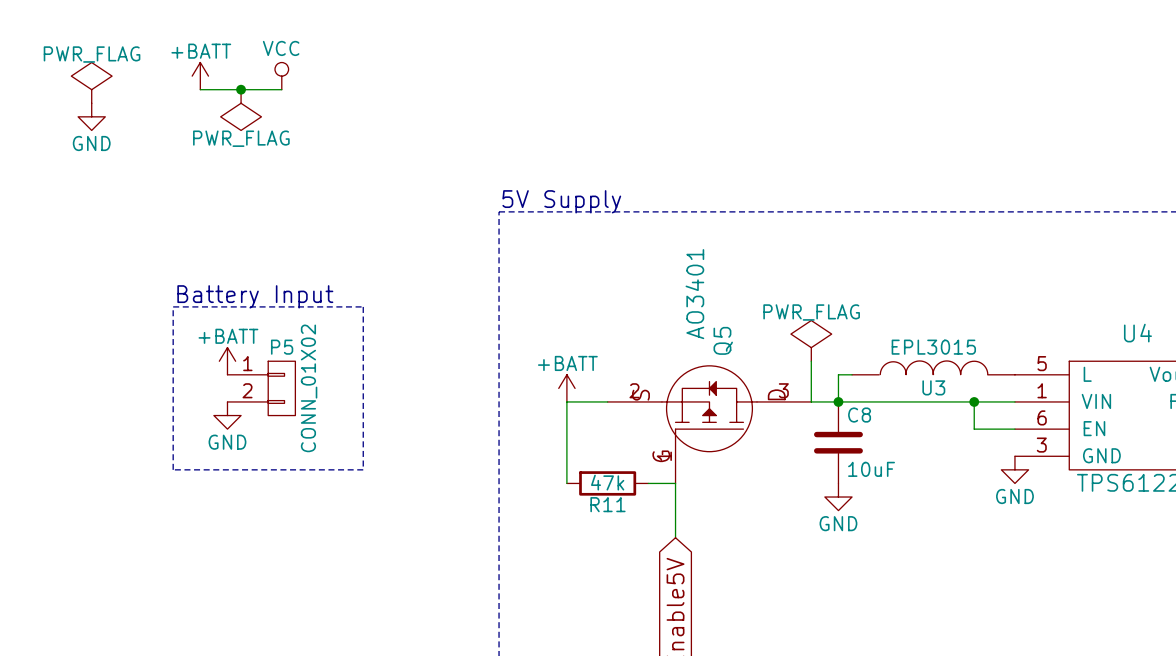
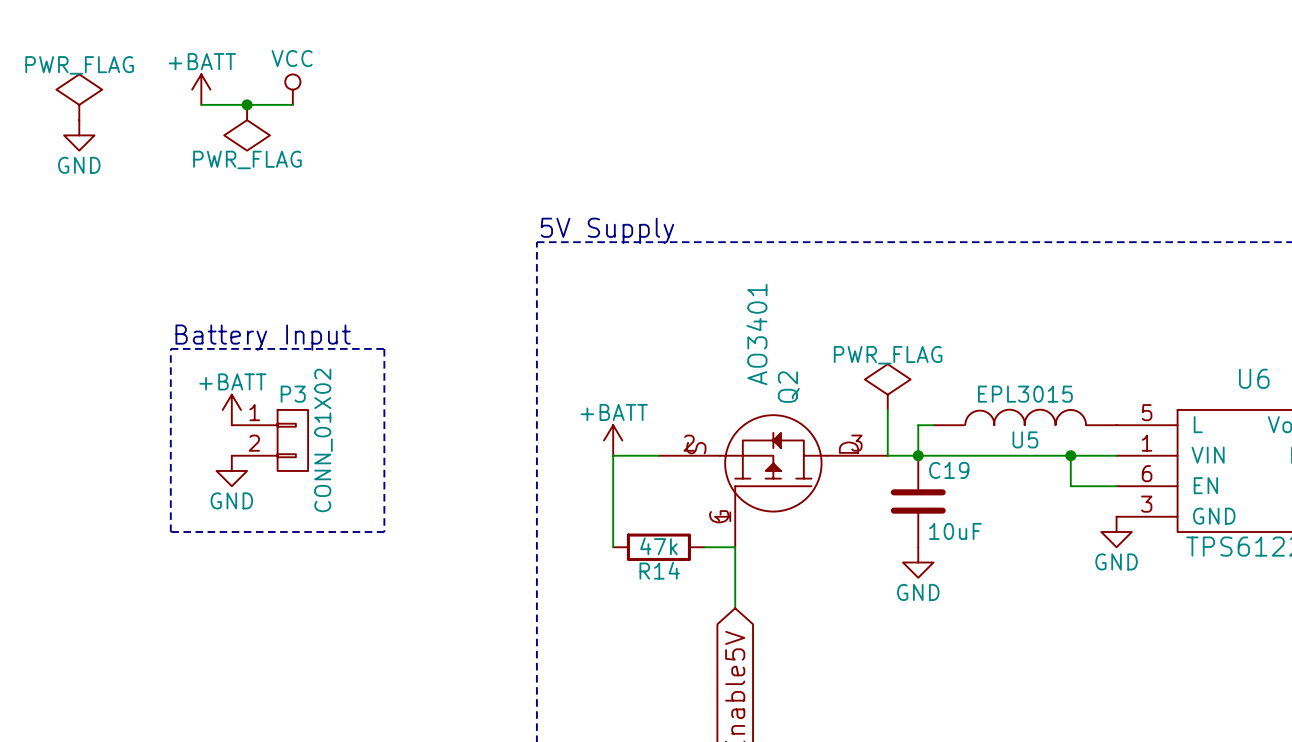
U4 name: U4 (1137, 333) -> U6 (1254, 378)
Q5 name: Q5 (723, 340) -> Q2 (788, 387)
P5 name: P5 (282, 347) -> P3 (293, 394)
U3 name: U3 (933, 387) -> U5 (1025, 439)
C8 name: C8 (859, 415) -> C19 (949, 470)
R11 name: R11 (607, 504) -> R14 (659, 570)

